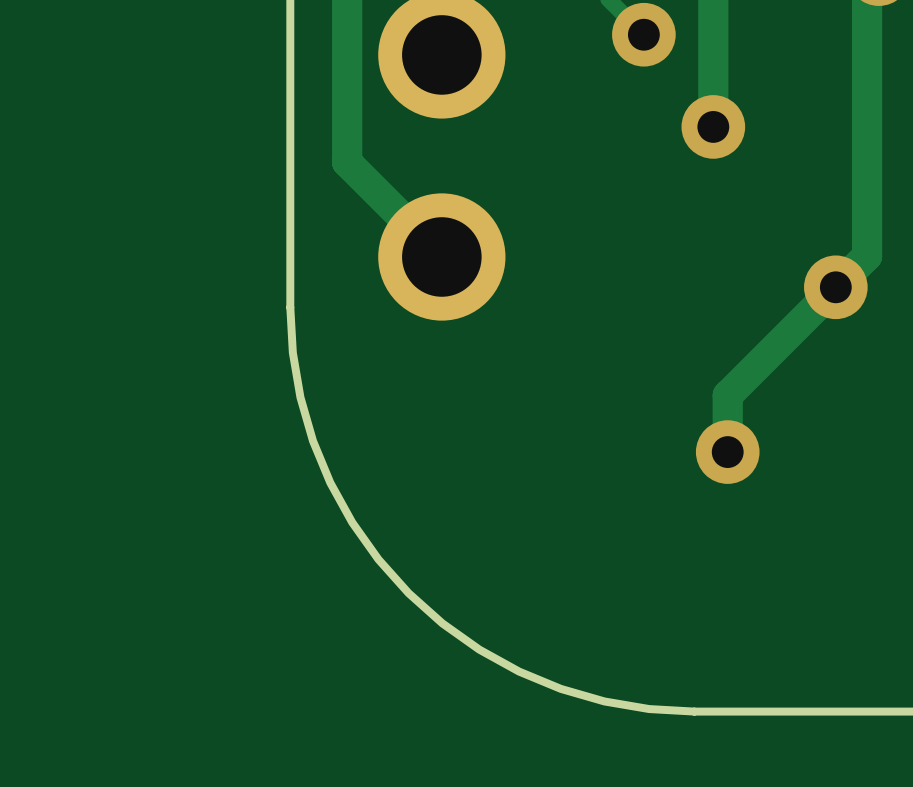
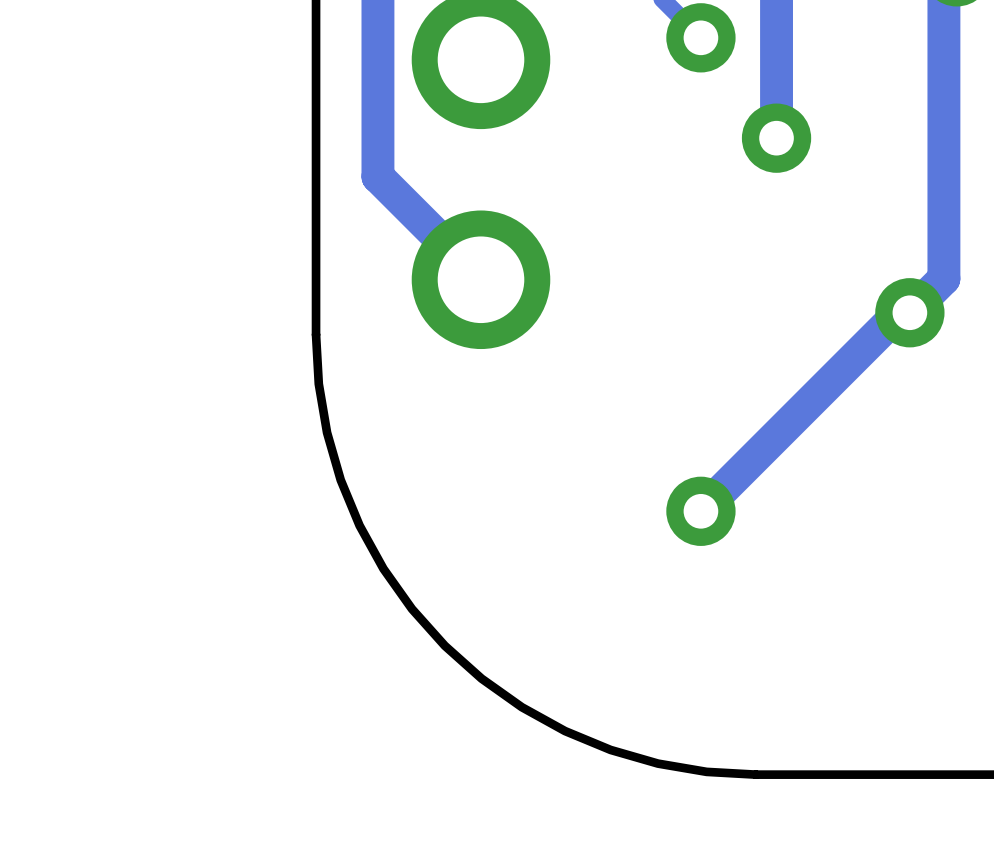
track: (835, 287) (727, 395) (727, 452) -> (909, 312) (899, 312) (700, 511)
via position: (727, 452) -> (700, 511)

